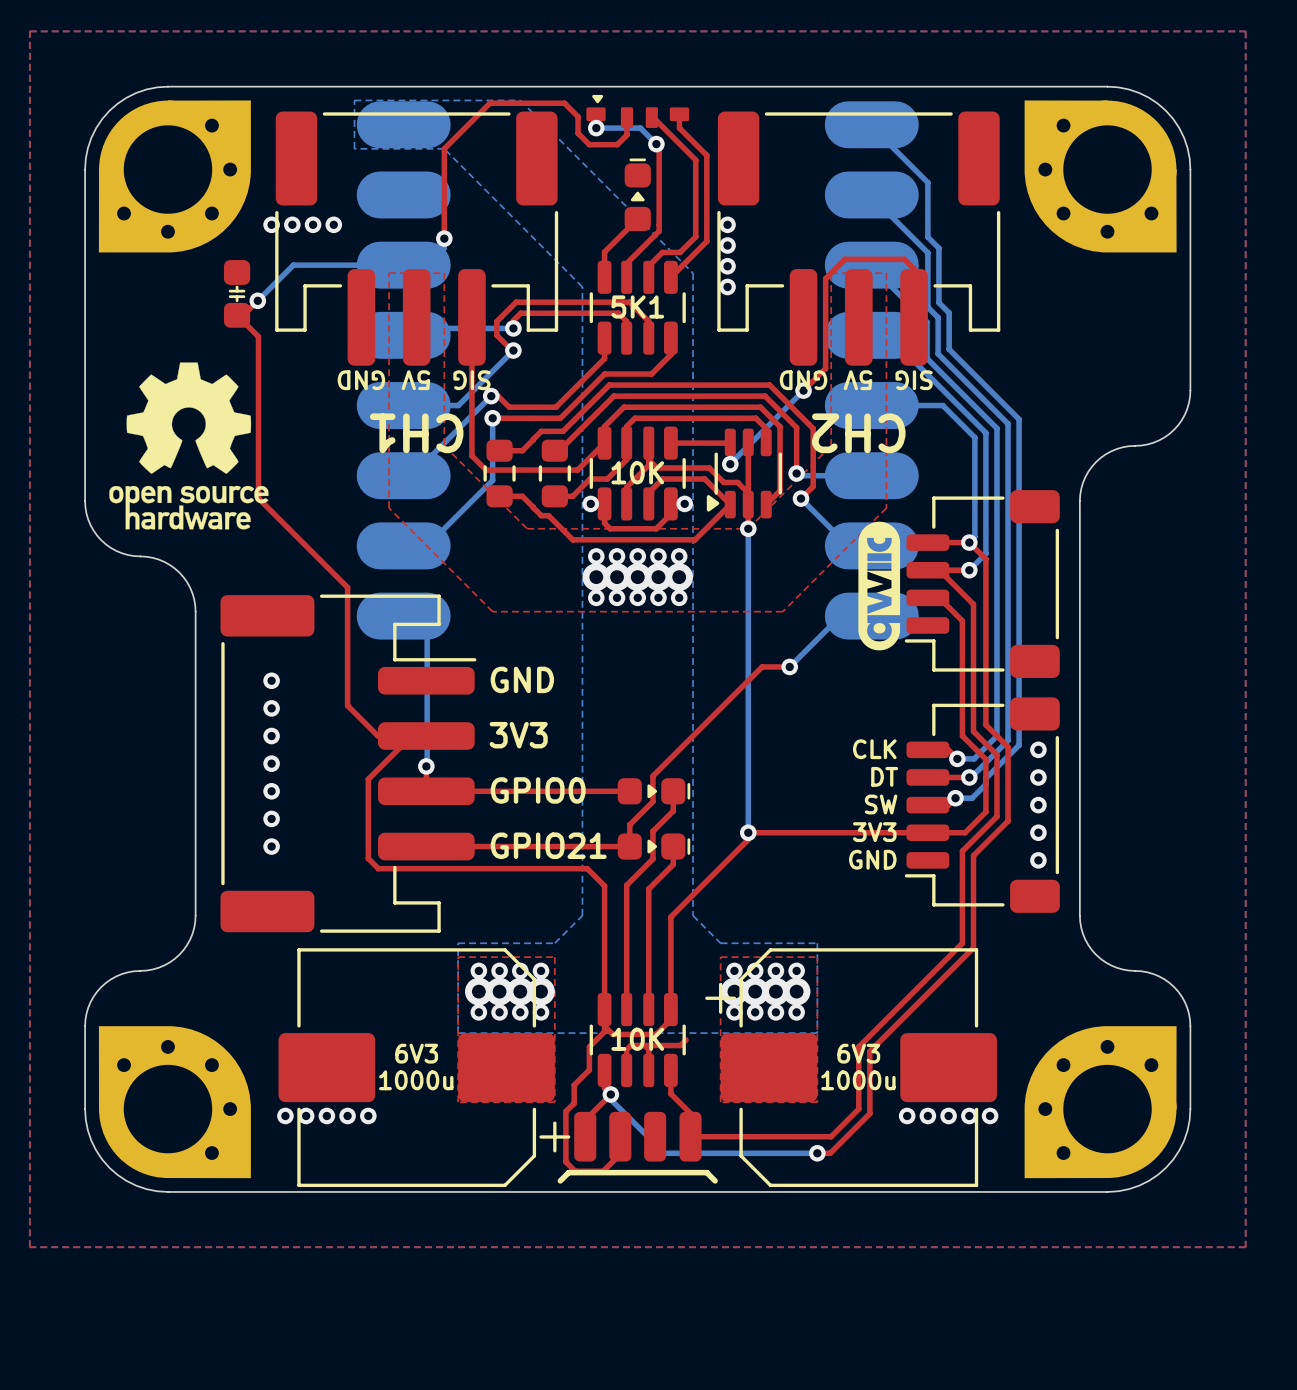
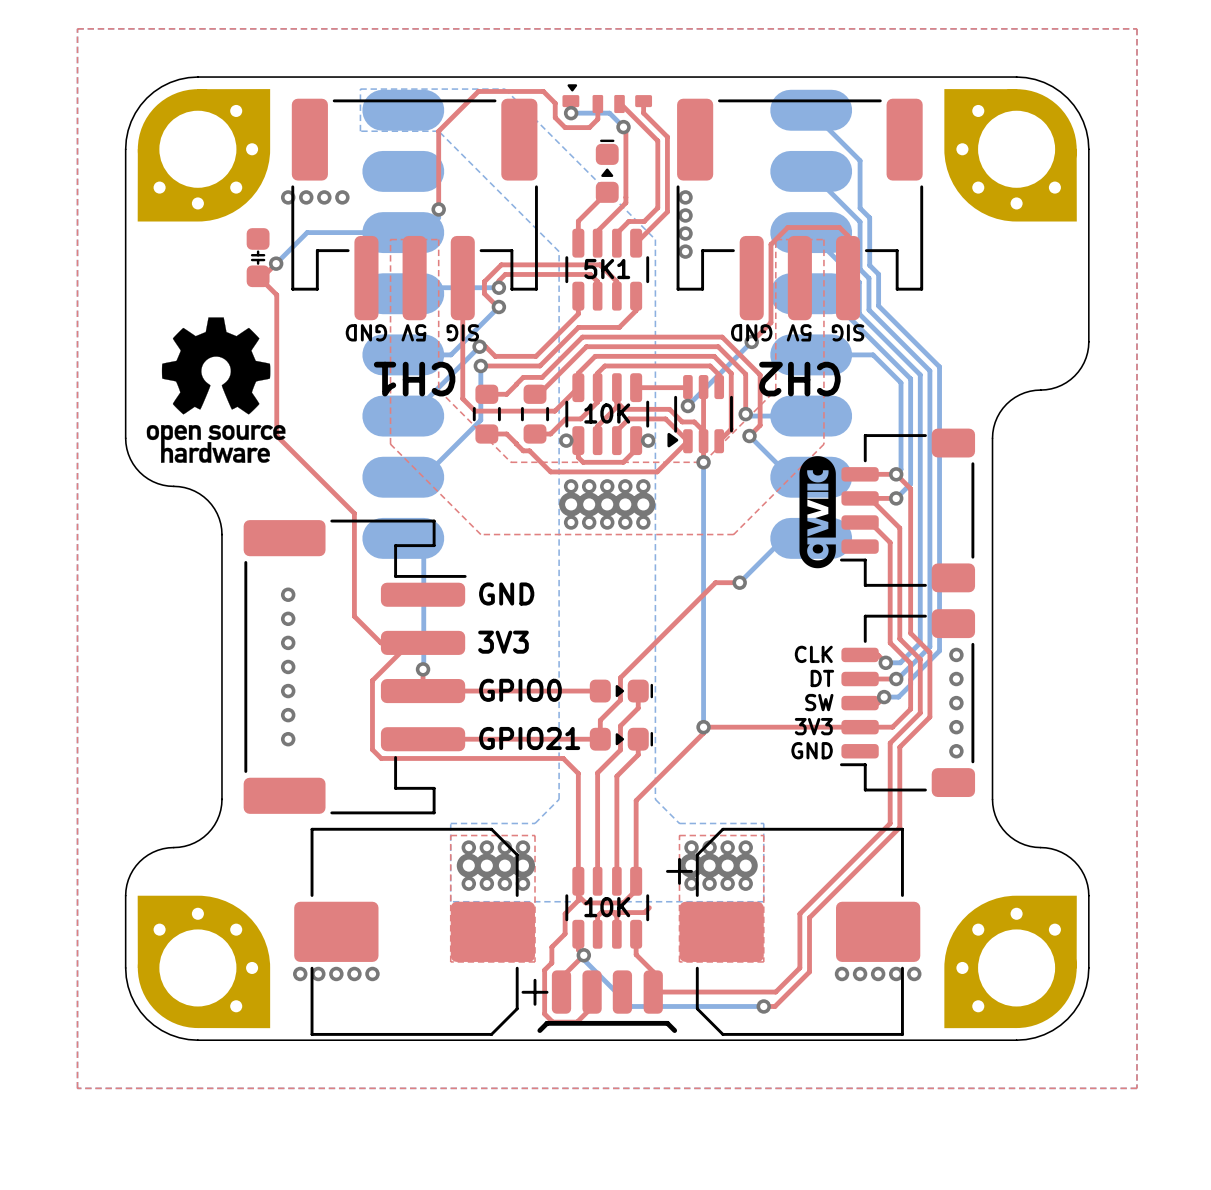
text: 6V3 (416, 1053) -> none
text: 6V3 (858, 1053) -> none
text: 1000u (416, 1080) -> none
text: 1000u (858, 1080) -> none

